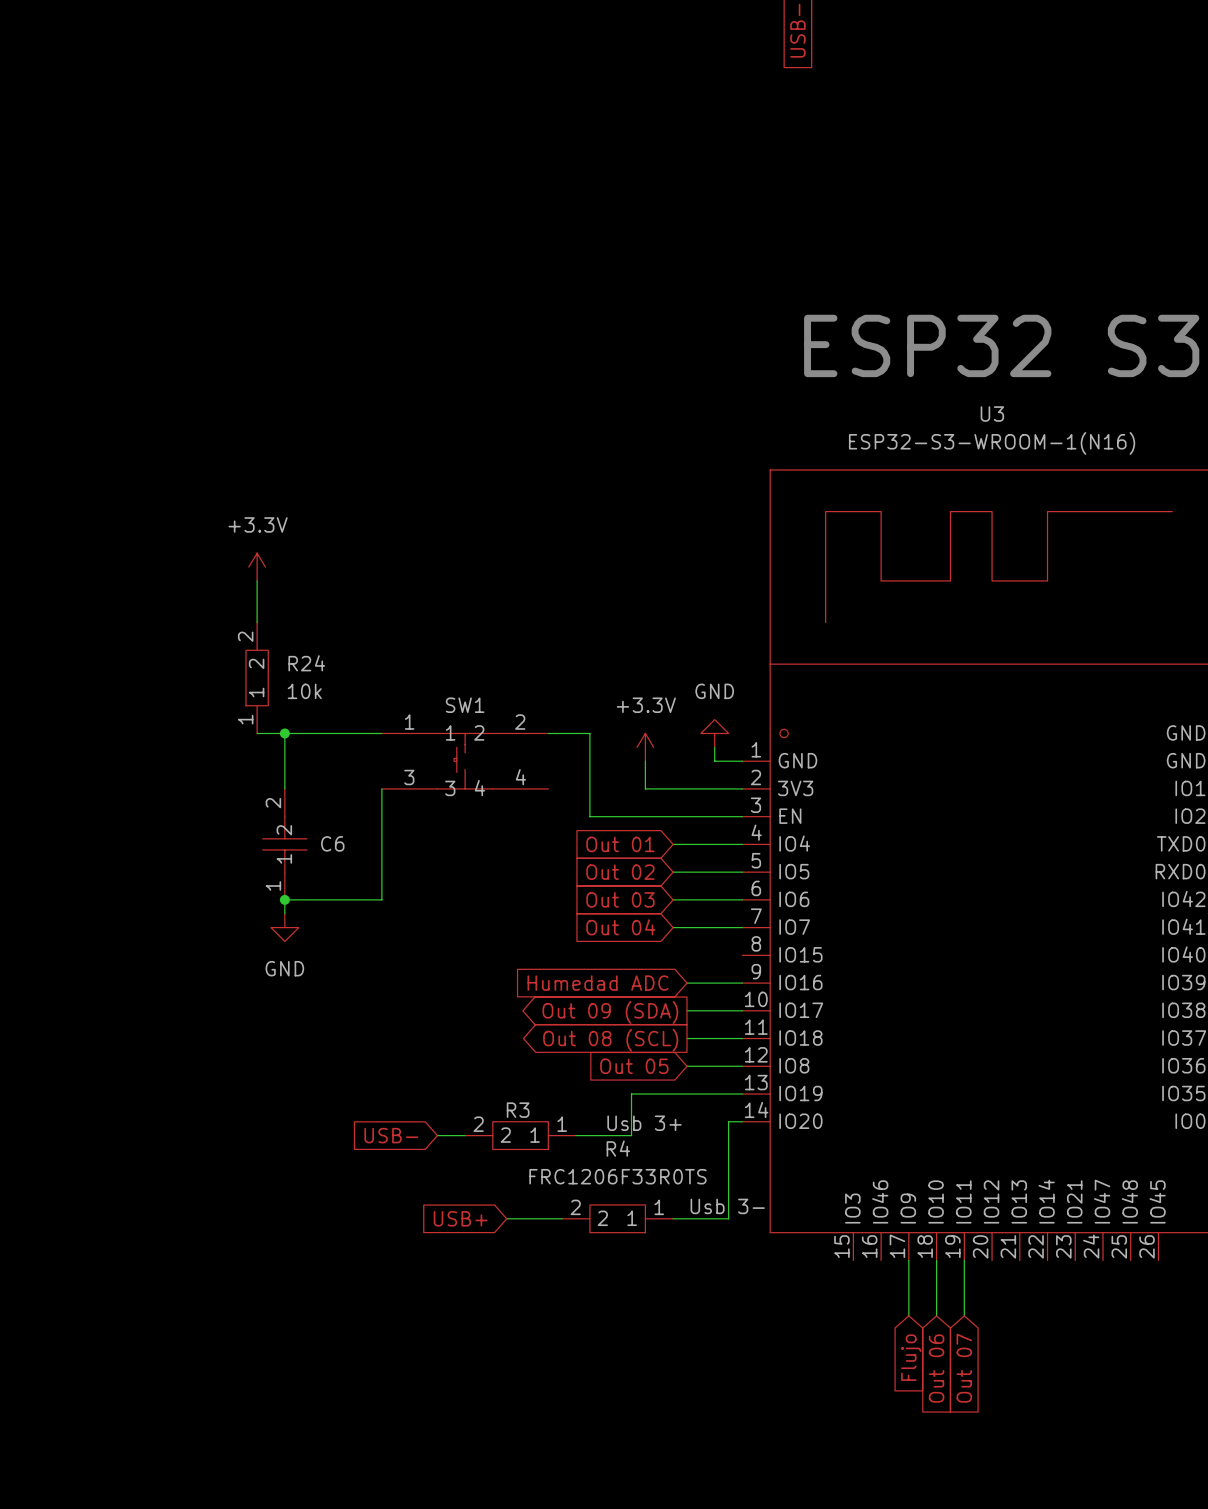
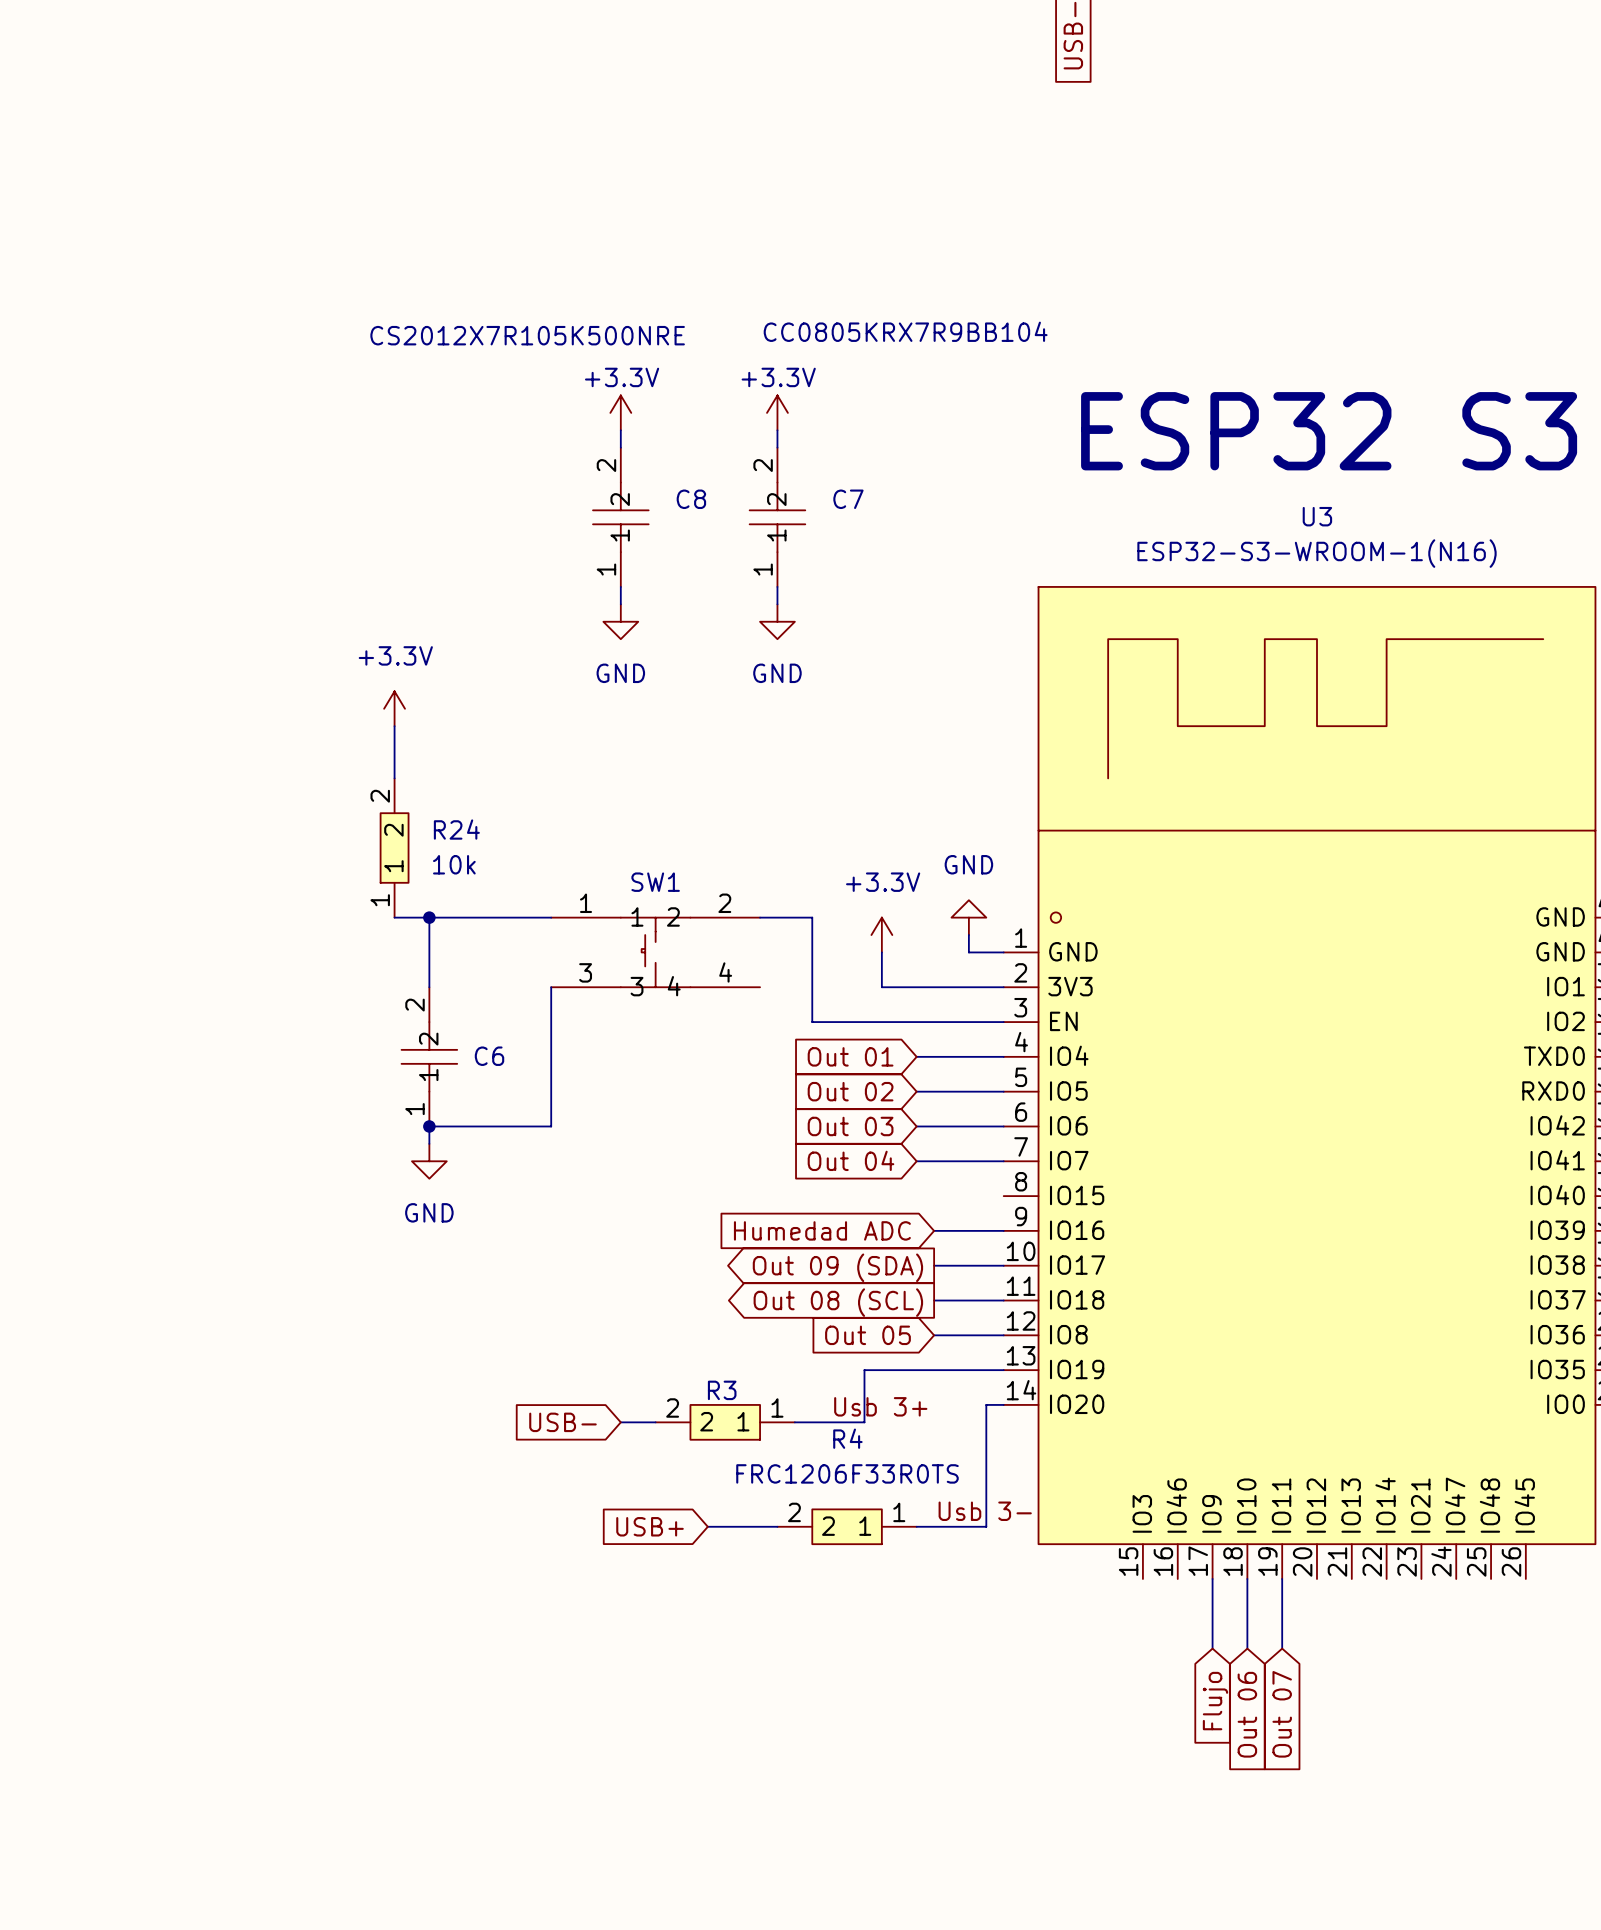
power symbol: none -> +3.3V (620, 412)
power symbol: none -> +3.3V (777, 412)
wire: none -> (620, 430) (620, 447)
wire: none -> (777, 430) (777, 447)
C8: none -> CS2012X7R105K500NRE (620, 517)
C7: none -> CC0805KRX7R9BB104 (777, 517)
wire: none -> (620, 586) (620, 604)
wire: none -> (777, 586) (777, 604)
power symbol: none -> GND (620, 621)
power symbol: none -> GND (777, 621)

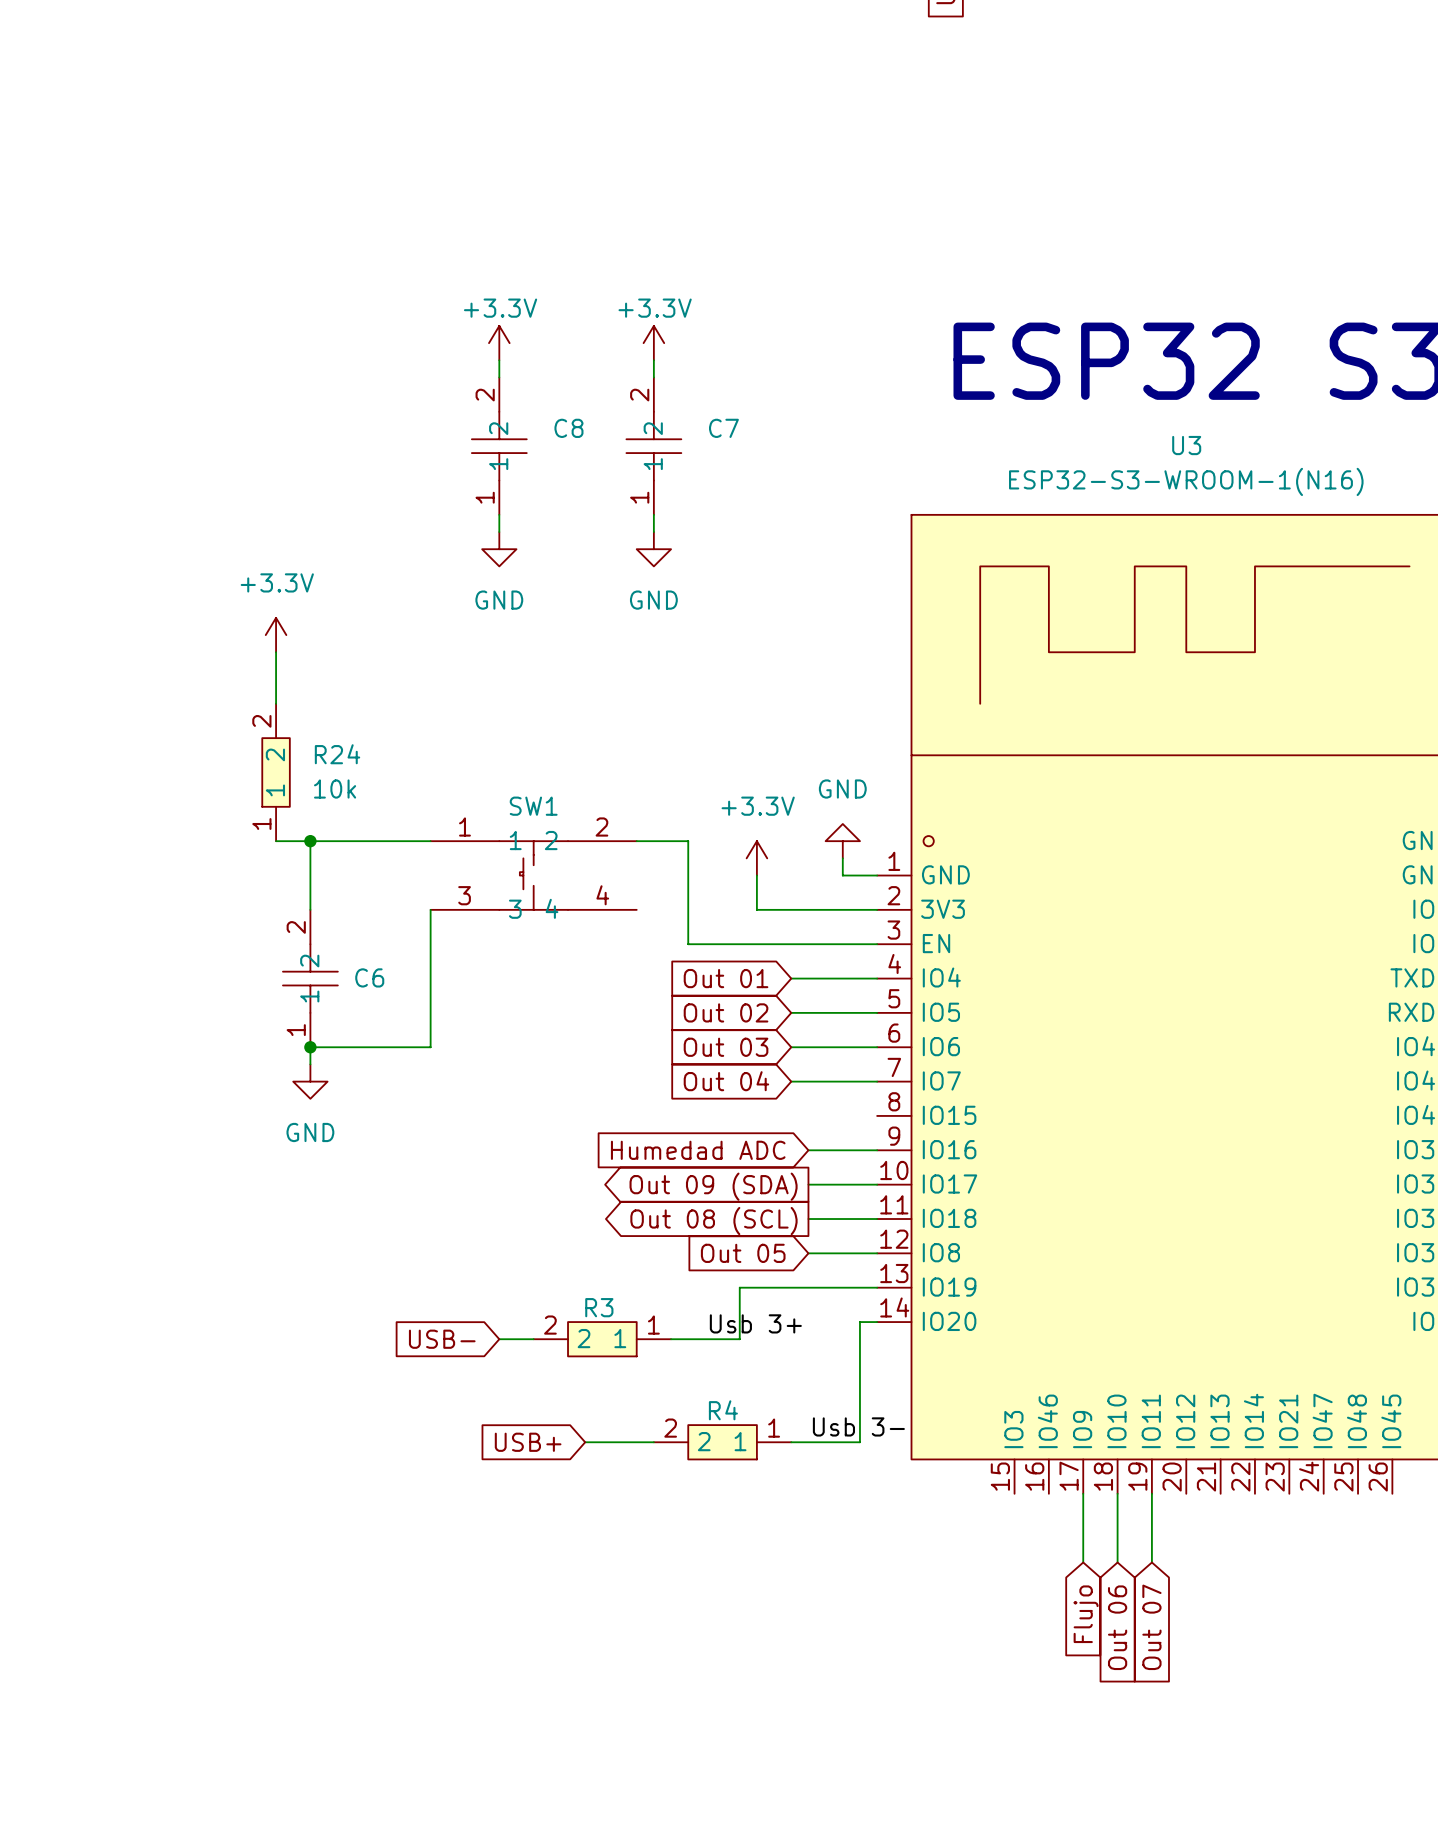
C7 value: CC0805KRX7R9BB104 (905, 331) -> none
C8 value: CS2012X7R105K500NRE (527, 335) -> none
R4 name position: R4 (847, 1438) -> R4 (723, 1410)
R4 value: FRC1206F33R0TS (847, 1473) -> none

